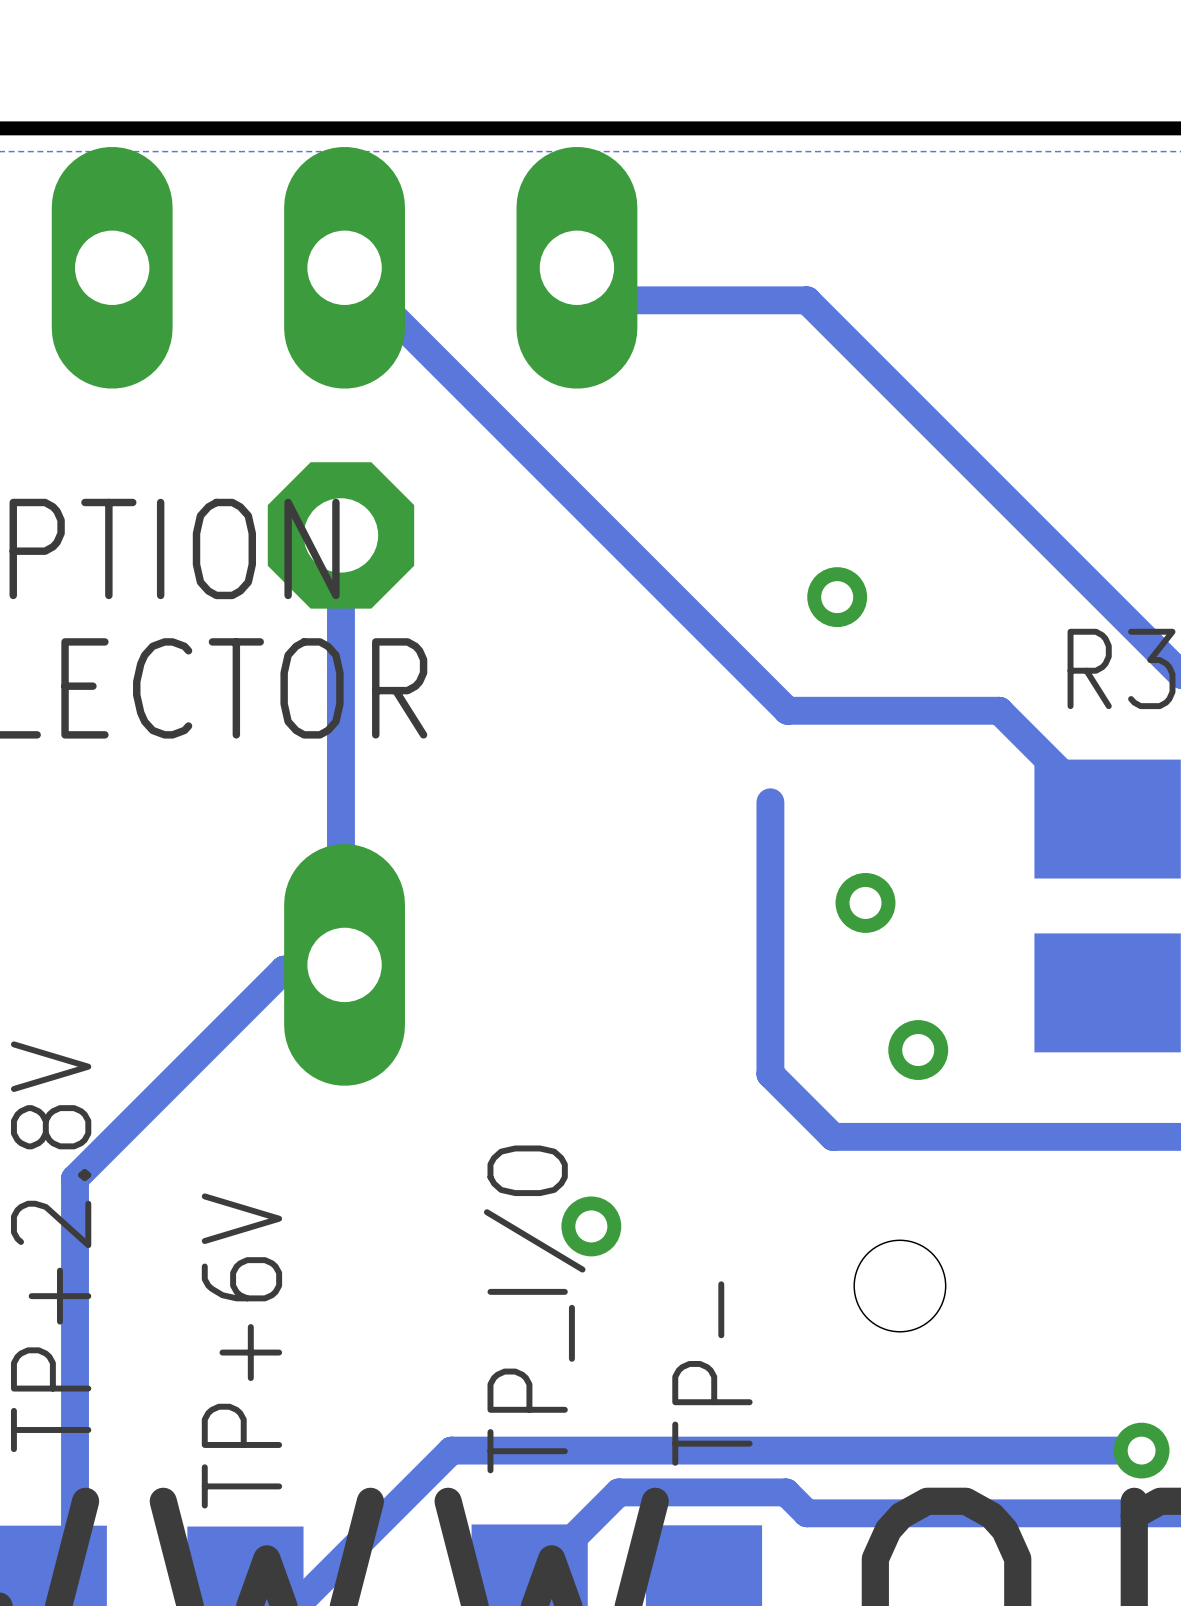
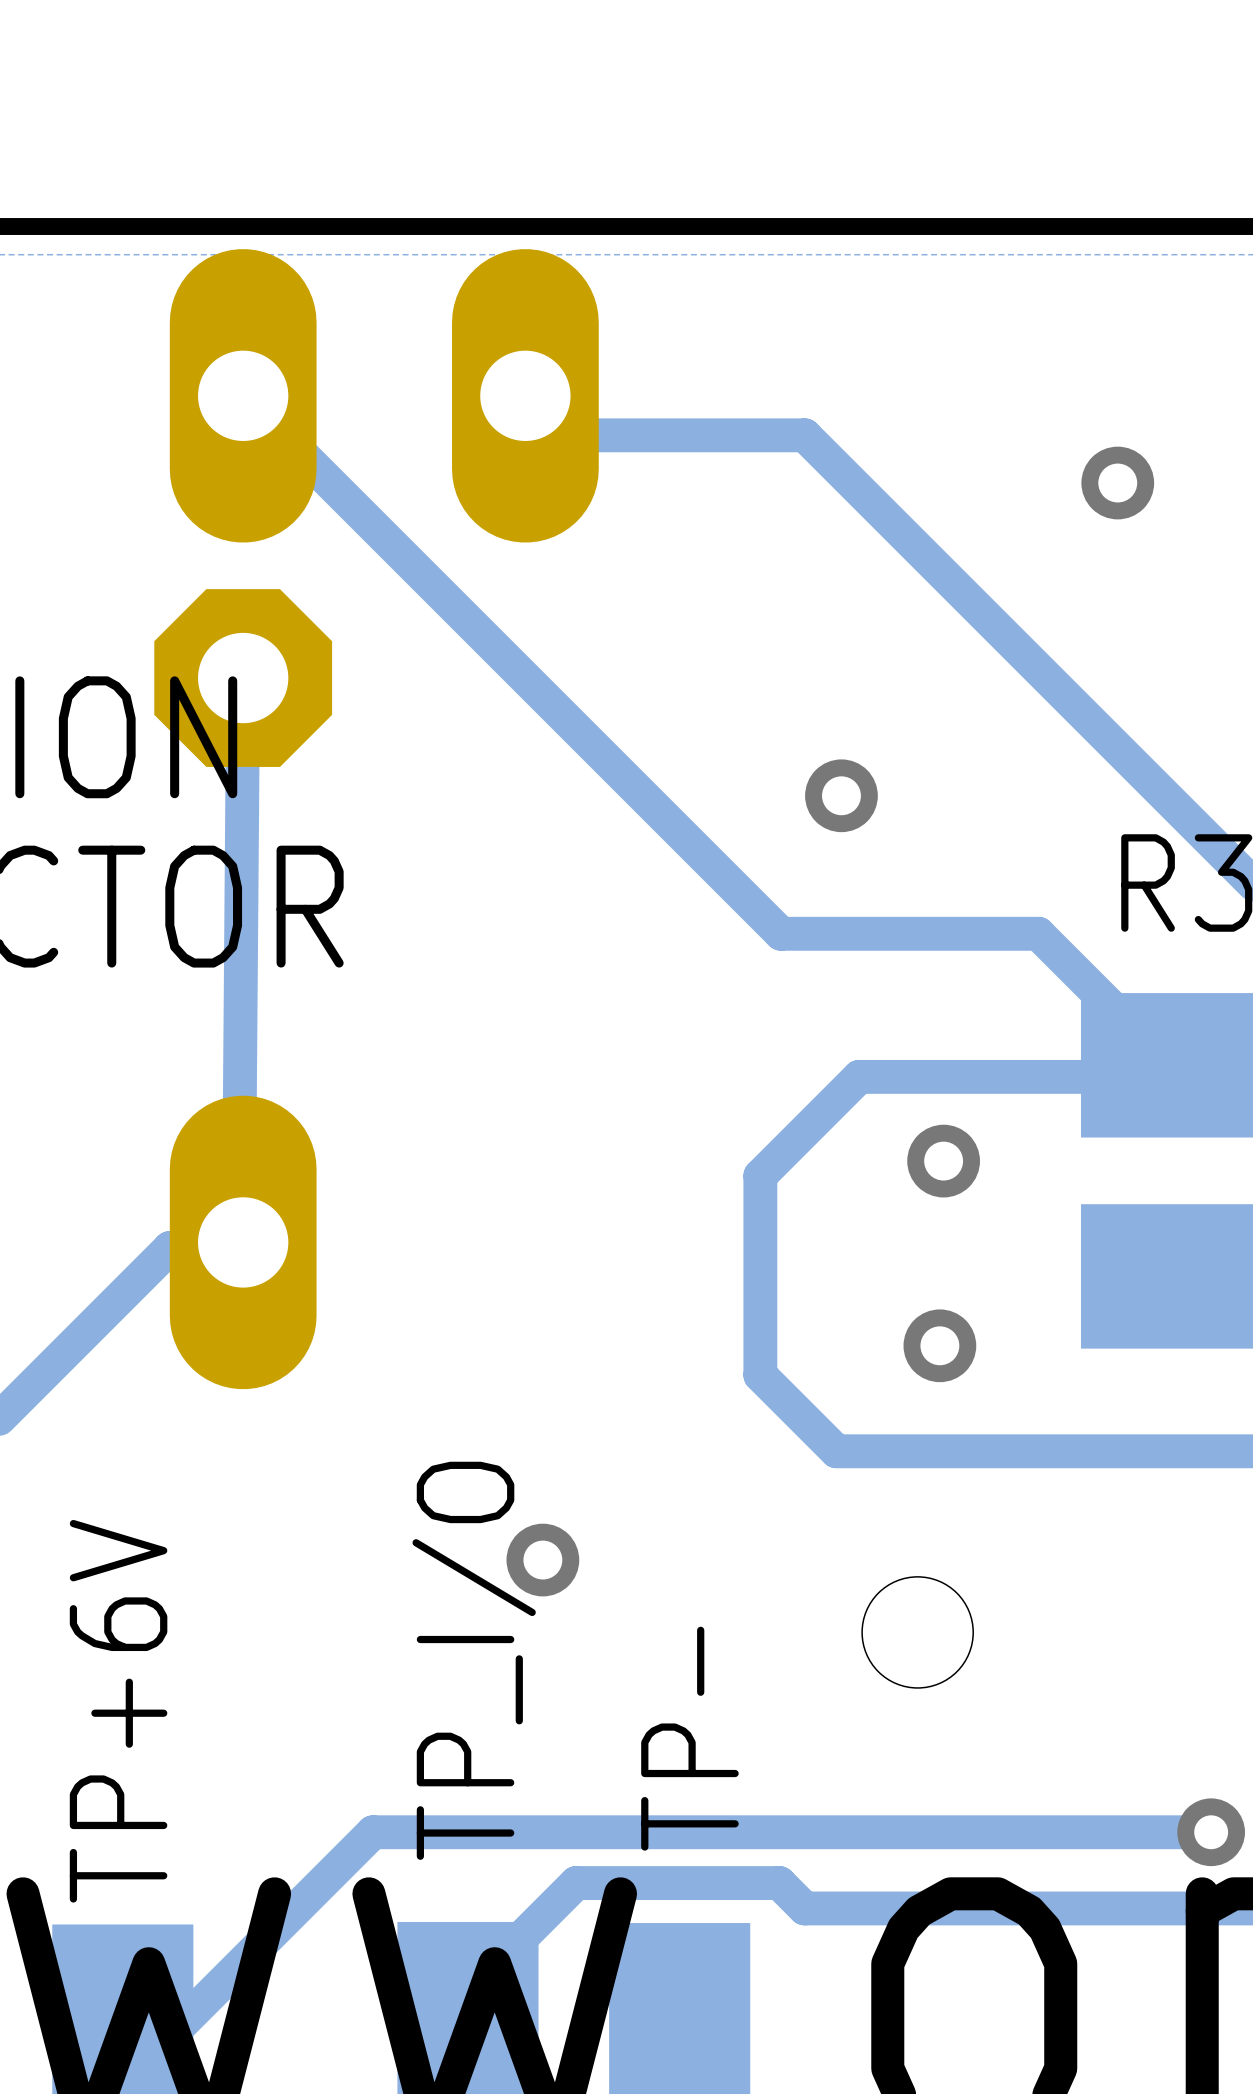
via: none -> (1117, 483)
track: (340, 535) (340, 955) -> (243, 678) (238, 1230)
part position: (340, 535) -> (243, 678)
track: (770, 802) (770, 910) -> (1169, 1065) (1158, 1076) (859, 1076) (760, 1175)
via position: (865, 902) -> (943, 1161)

